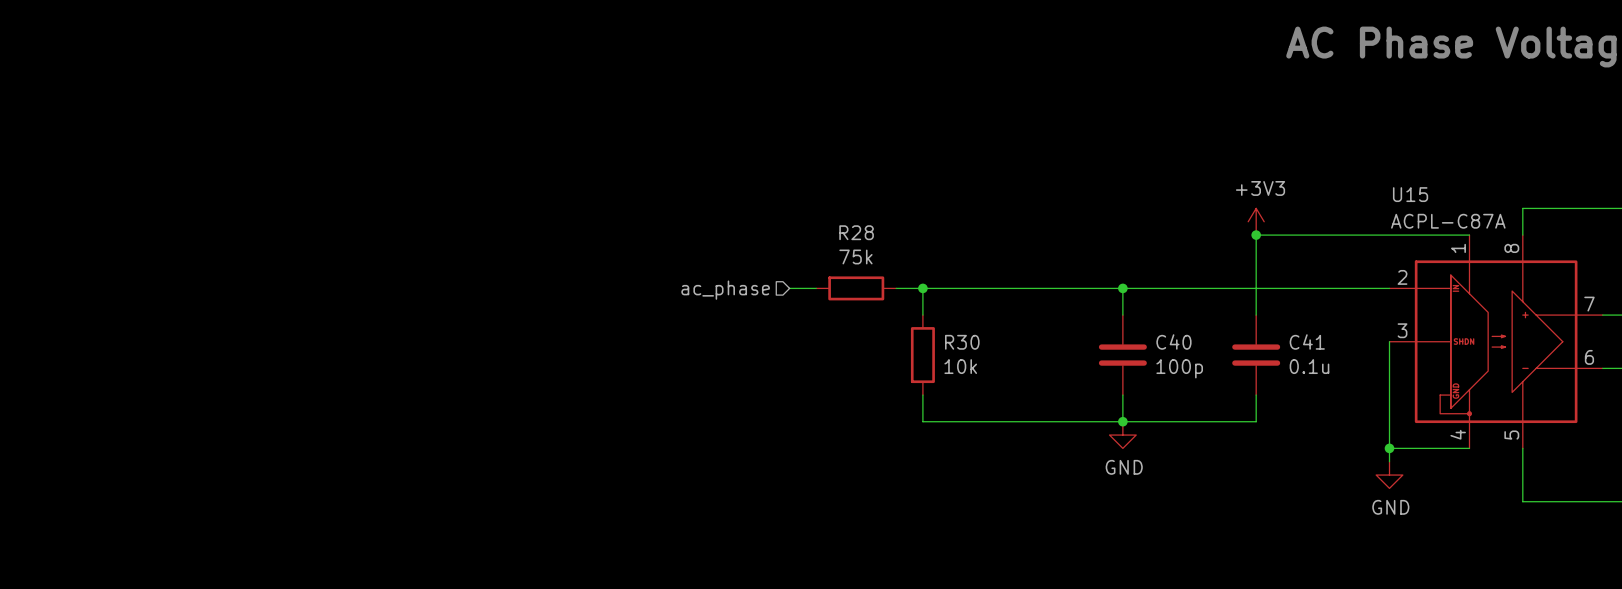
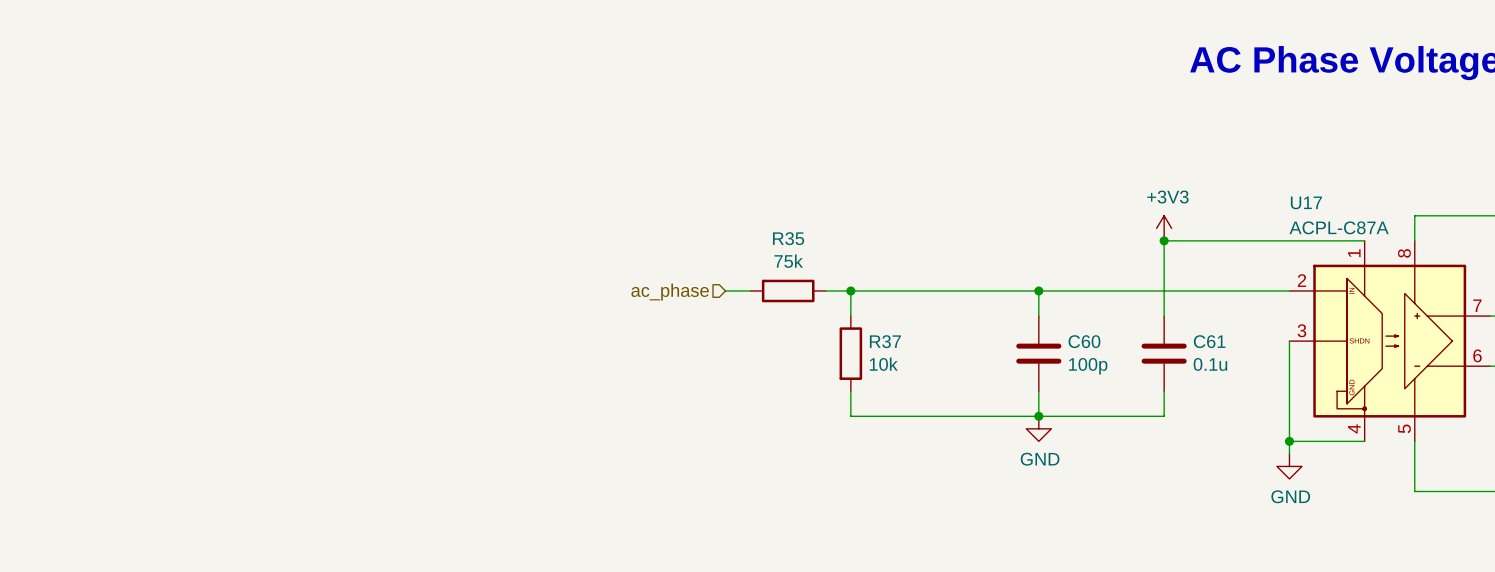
U15 name: U15 (1410, 194) -> U17 (1306, 202)
R28 name: R28 (856, 232) -> R35 (788, 238)
C40 name: C40 (1173, 341) -> C60 (1084, 341)
C41 name: C41 (1307, 341) -> C61 (1209, 341)
R30 name: R30 (962, 342) -> R37 (885, 341)

